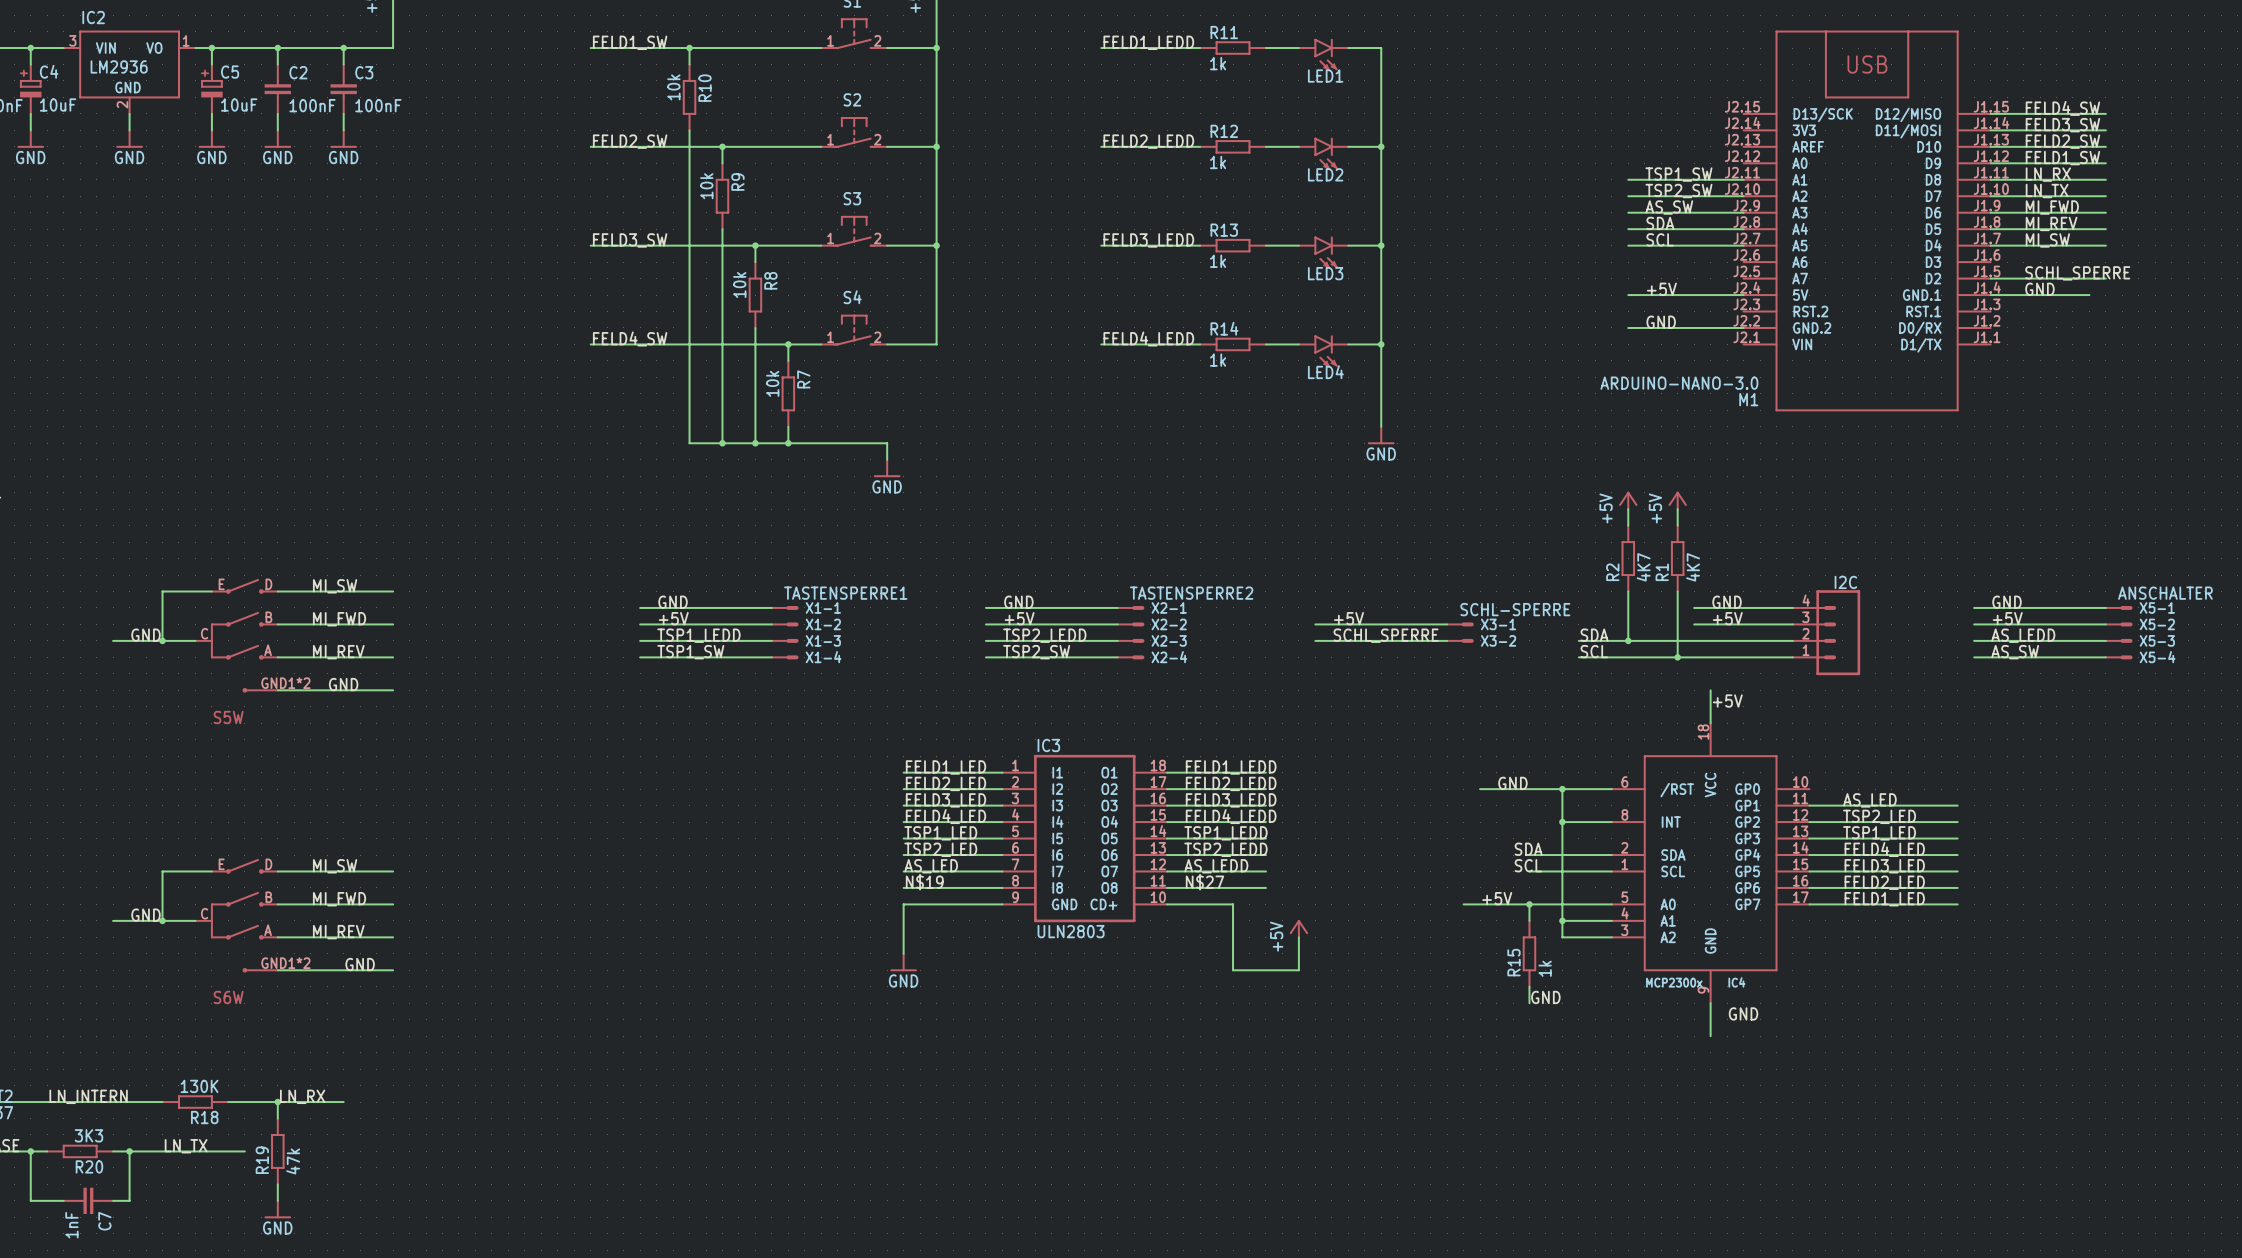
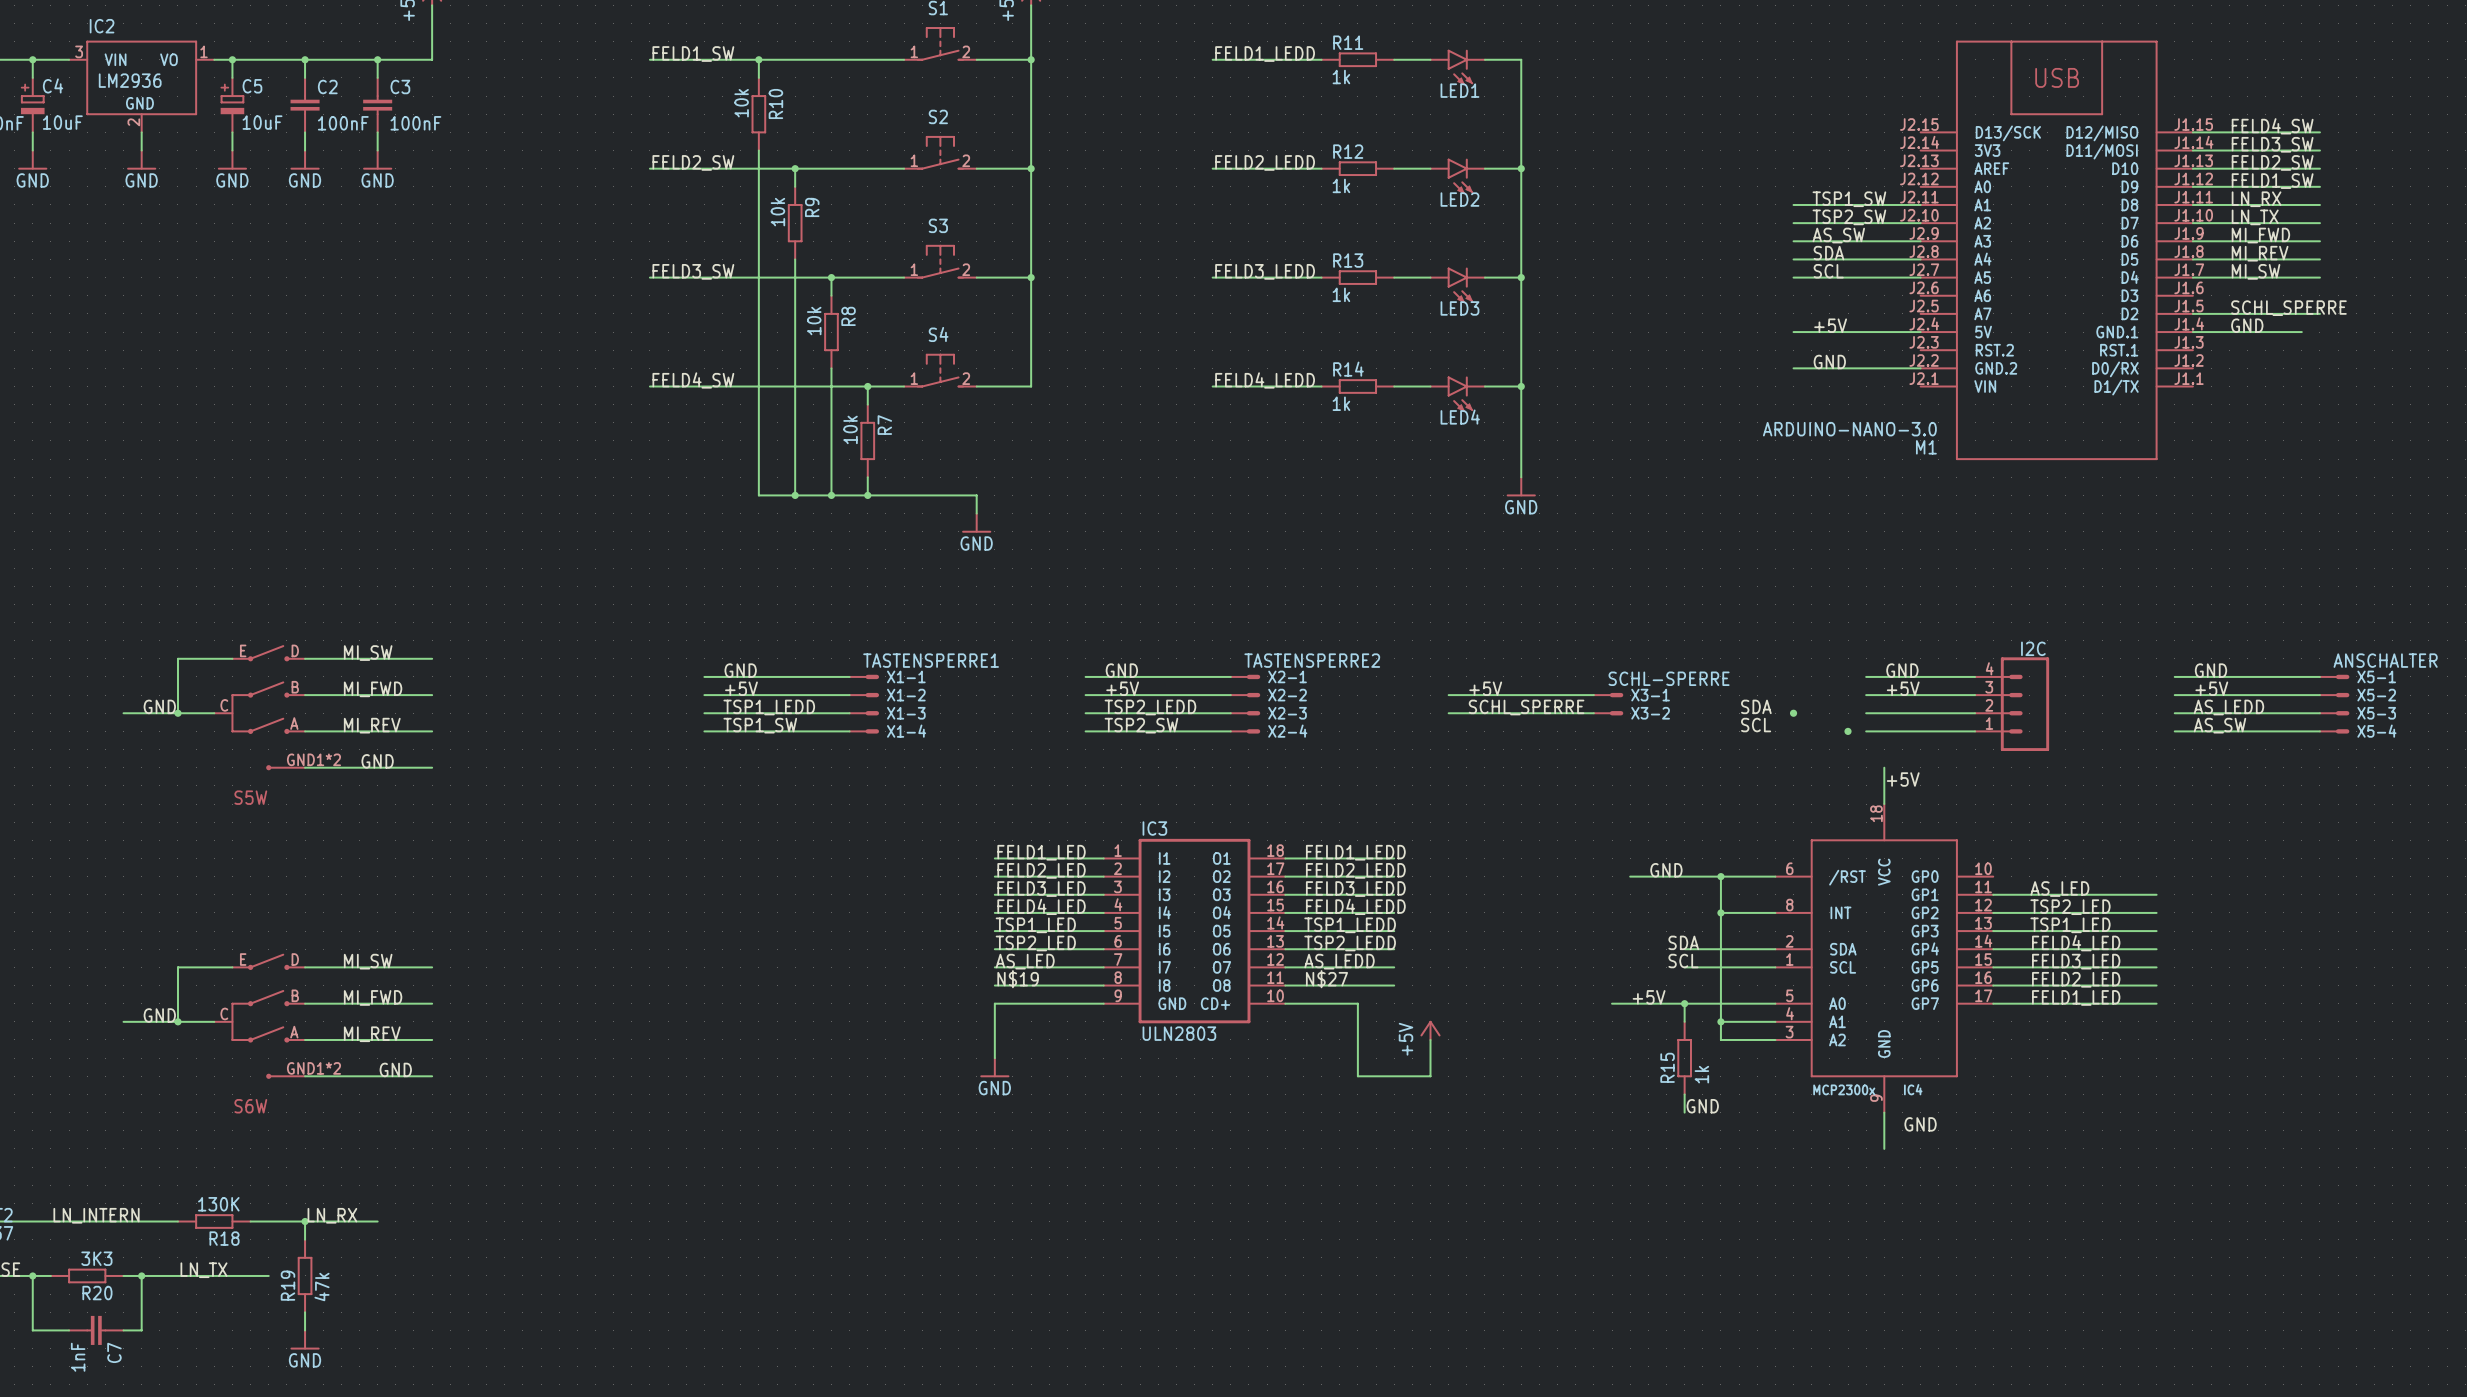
power symbol: +5V (1628, 500) -> none
power symbol: +5V (1677, 500) -> none
wire: (1628, 509) (1628, 525) -> none
wire: (1677, 509) (1677, 525) -> none
R2: 4K7 (1628, 558) -> none
R1: 4K7 (1677, 558) -> none
wire: (1628, 591) (1628, 640) -> none
wire: (1677, 591) (1677, 657) -> none
wire: (1578, 640) (1694, 640) -> none
wire: (1578, 657) (1694, 657) -> none

